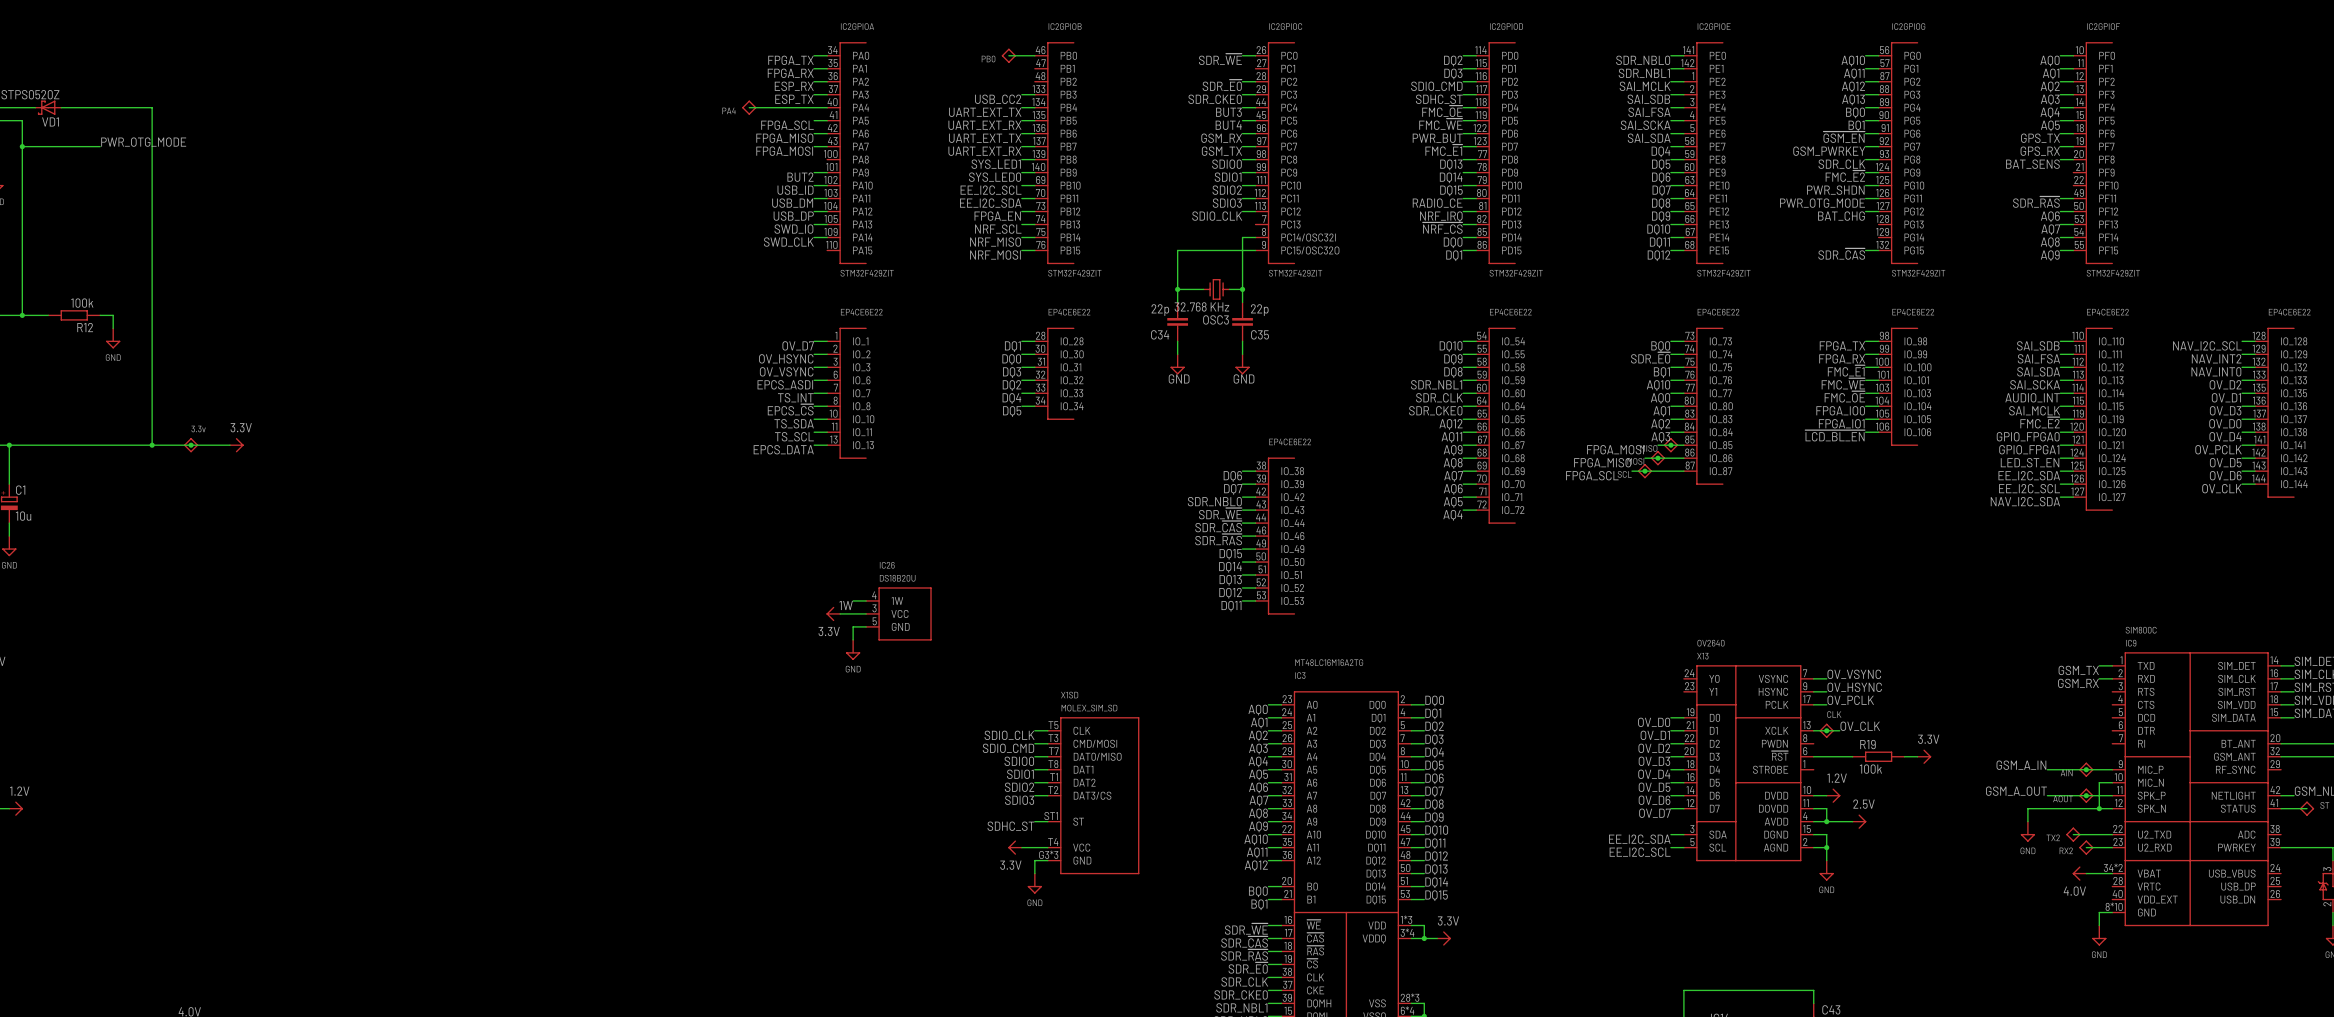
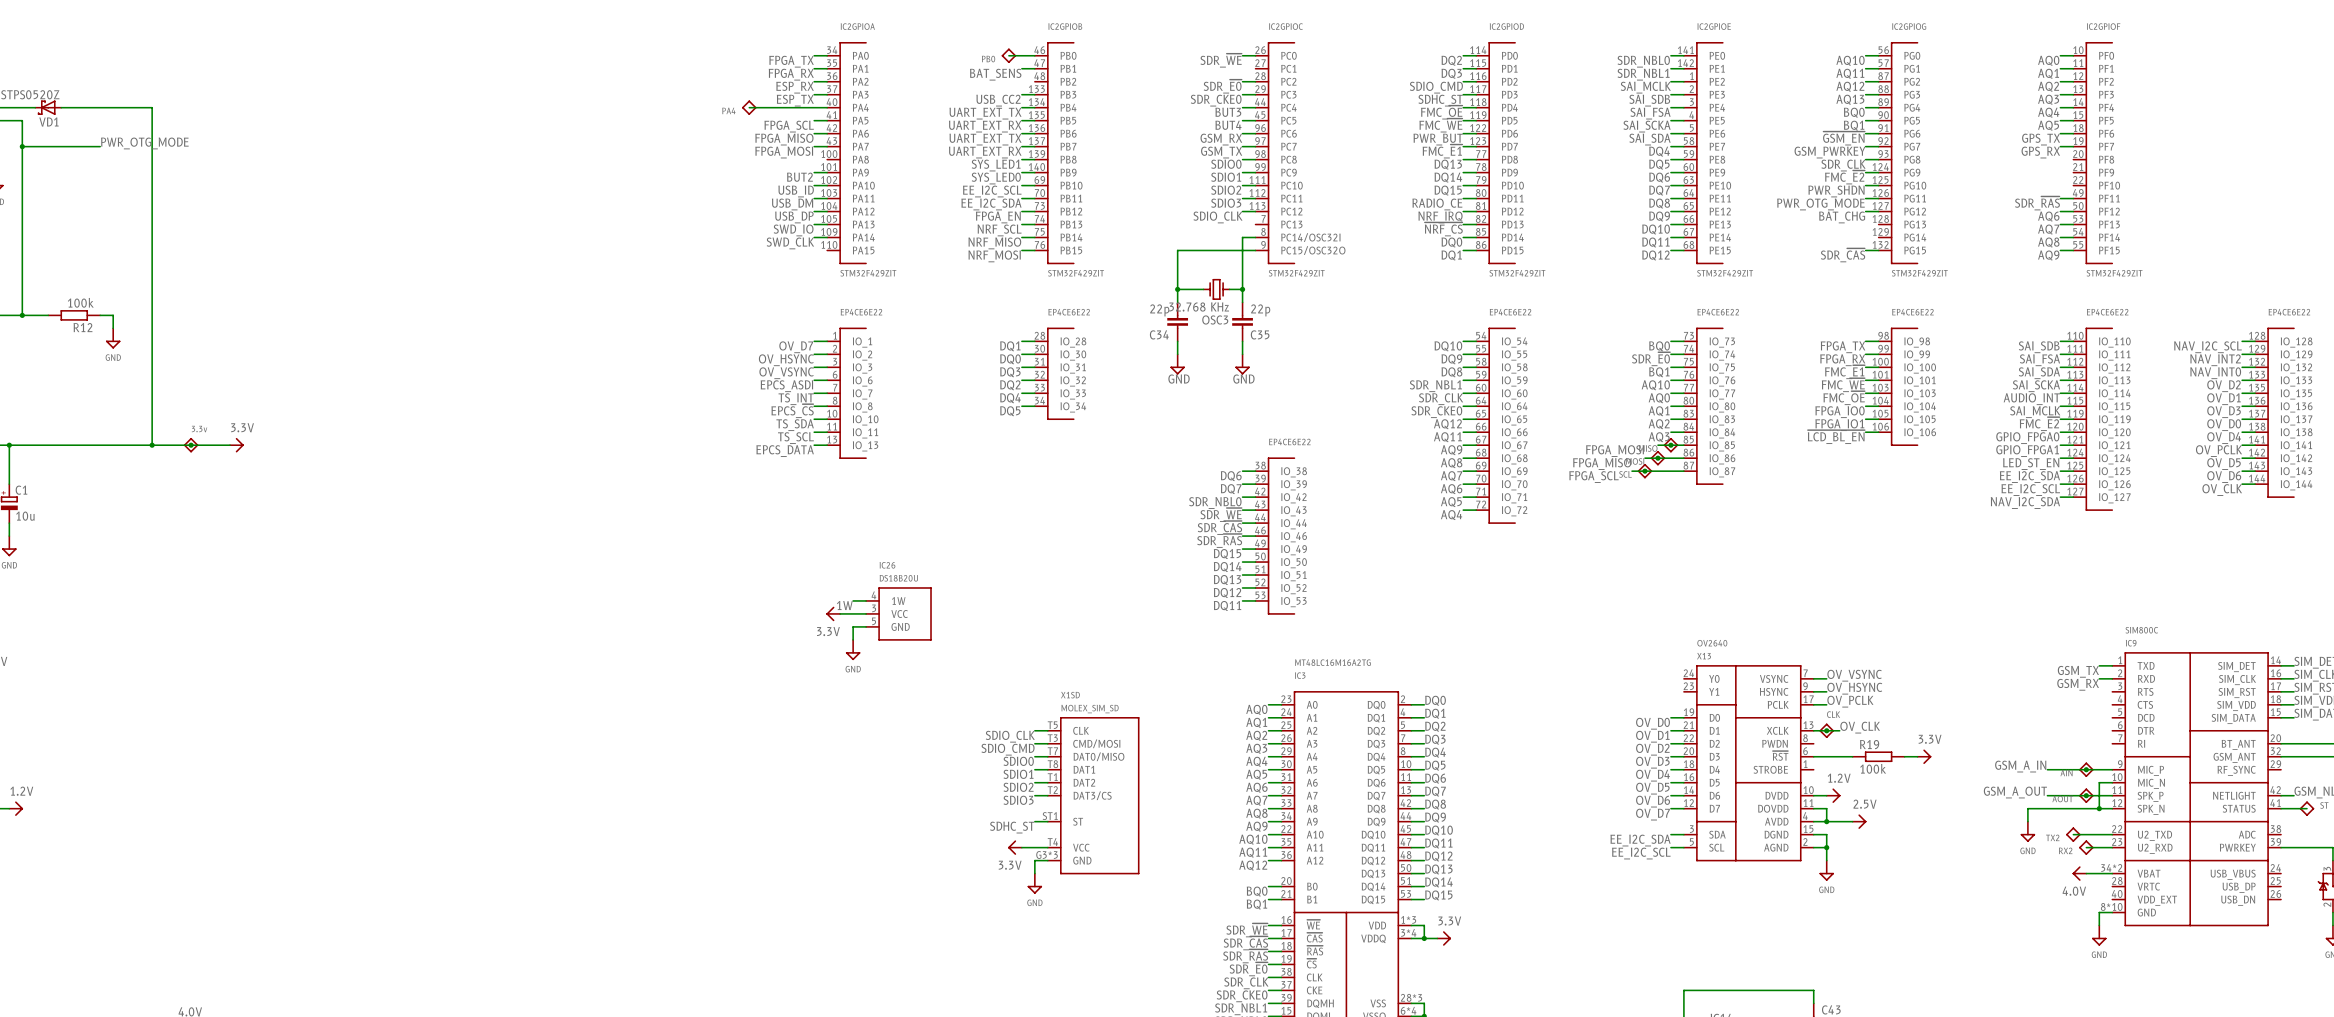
wire: none -> (1021, 68) (1034, 68)
label: none -> BAT_SENS (995, 74)
wire: (2060, 159) (2073, 159) -> none
label: BAT_SENS (2032, 164) -> none

